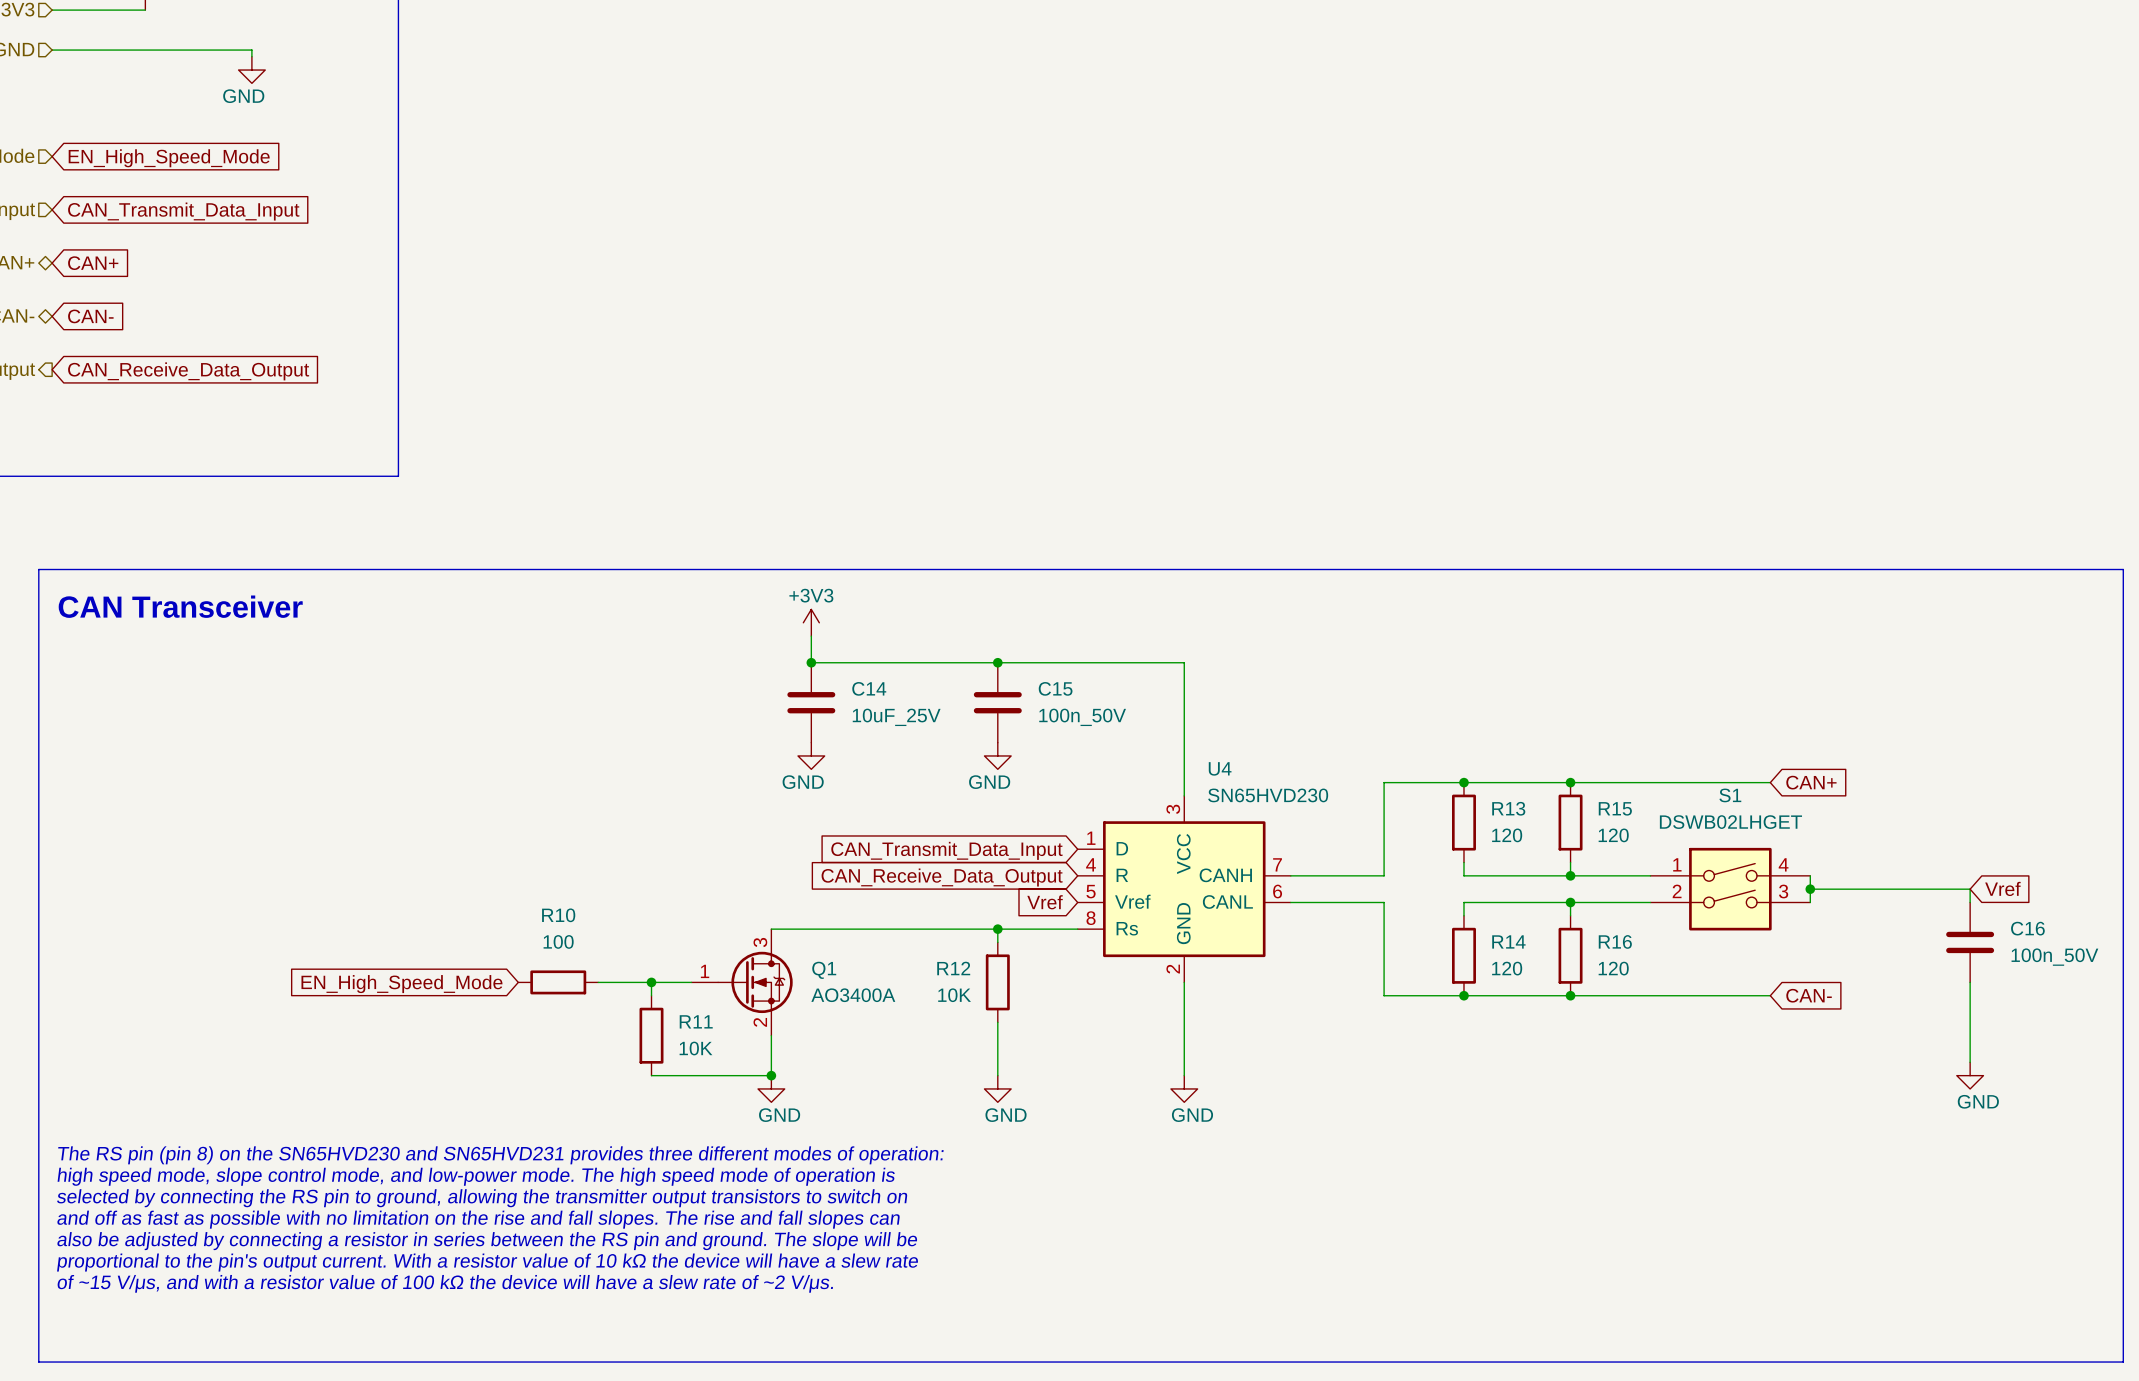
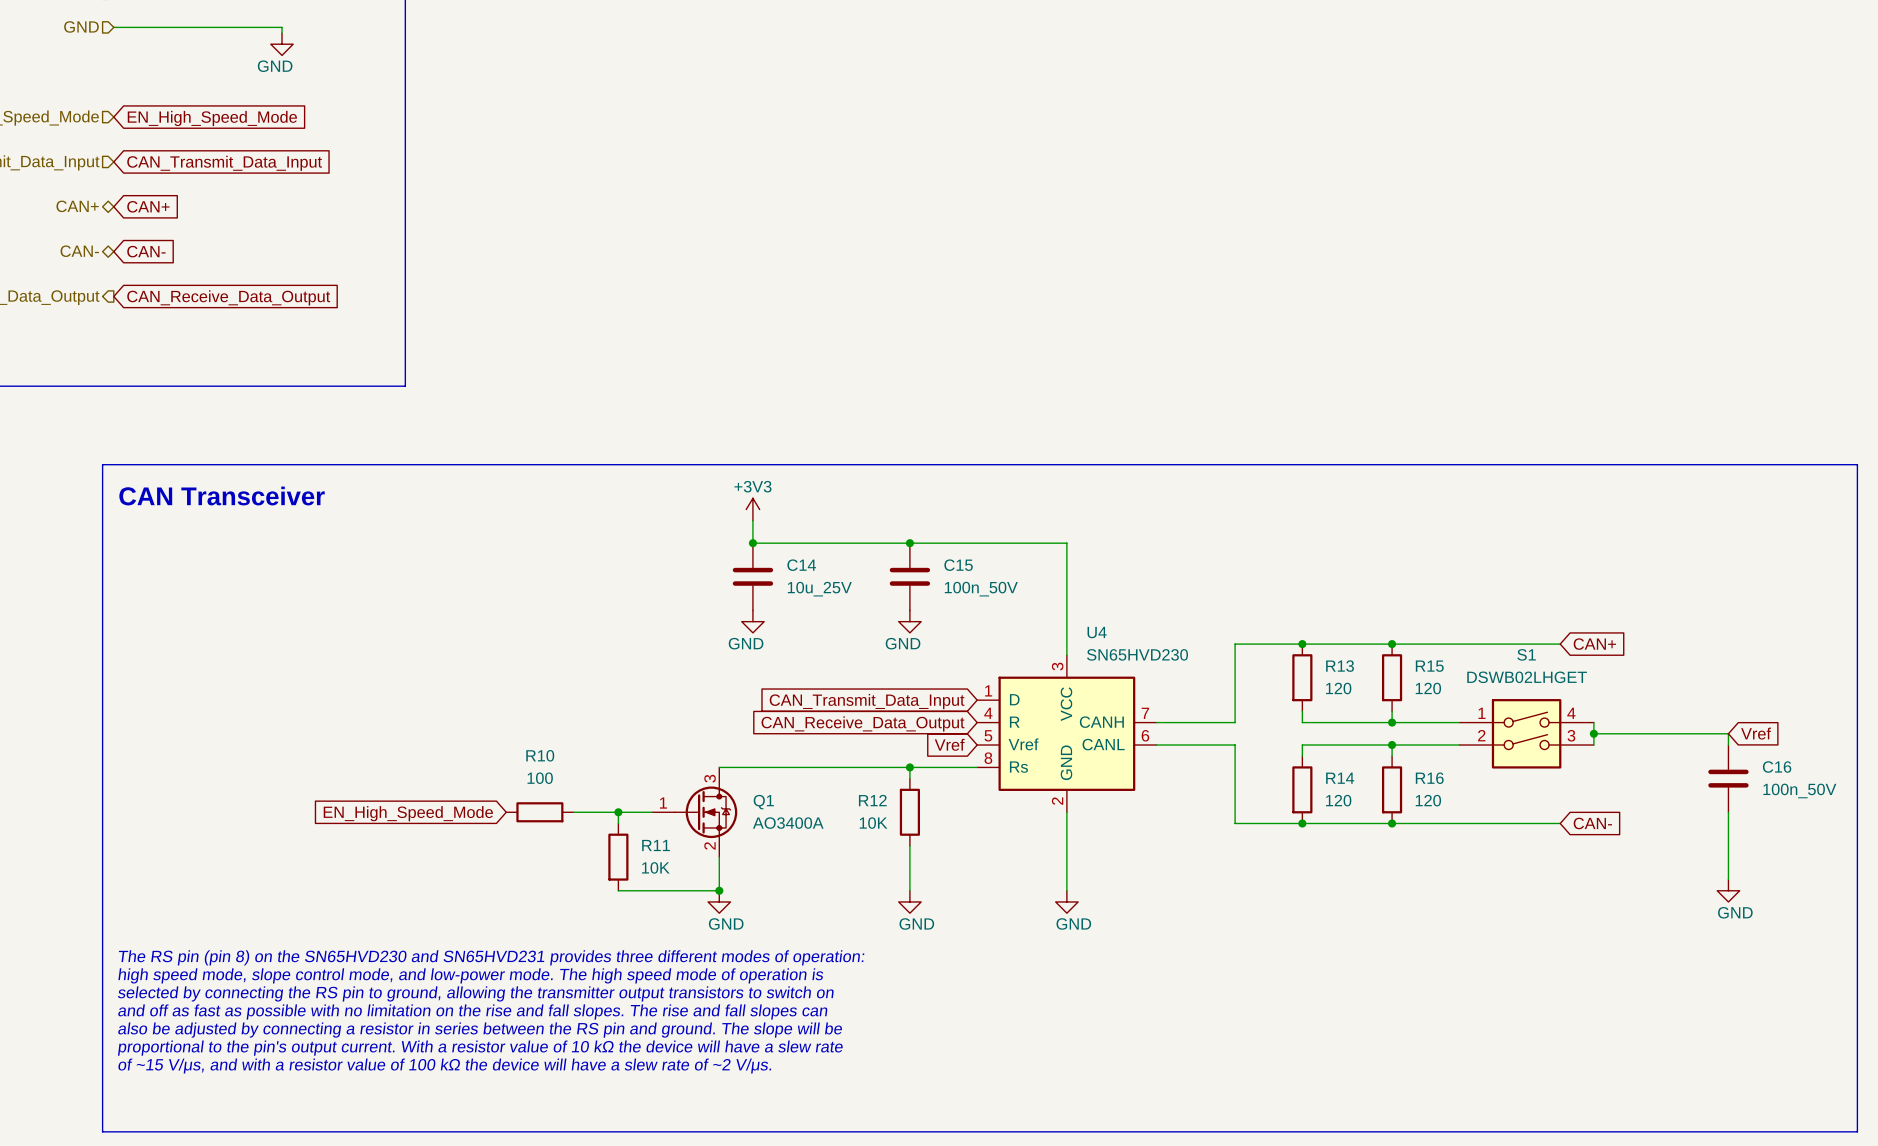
C14 value: 10uF_25V (896, 717) -> 10u_25V (819, 589)

